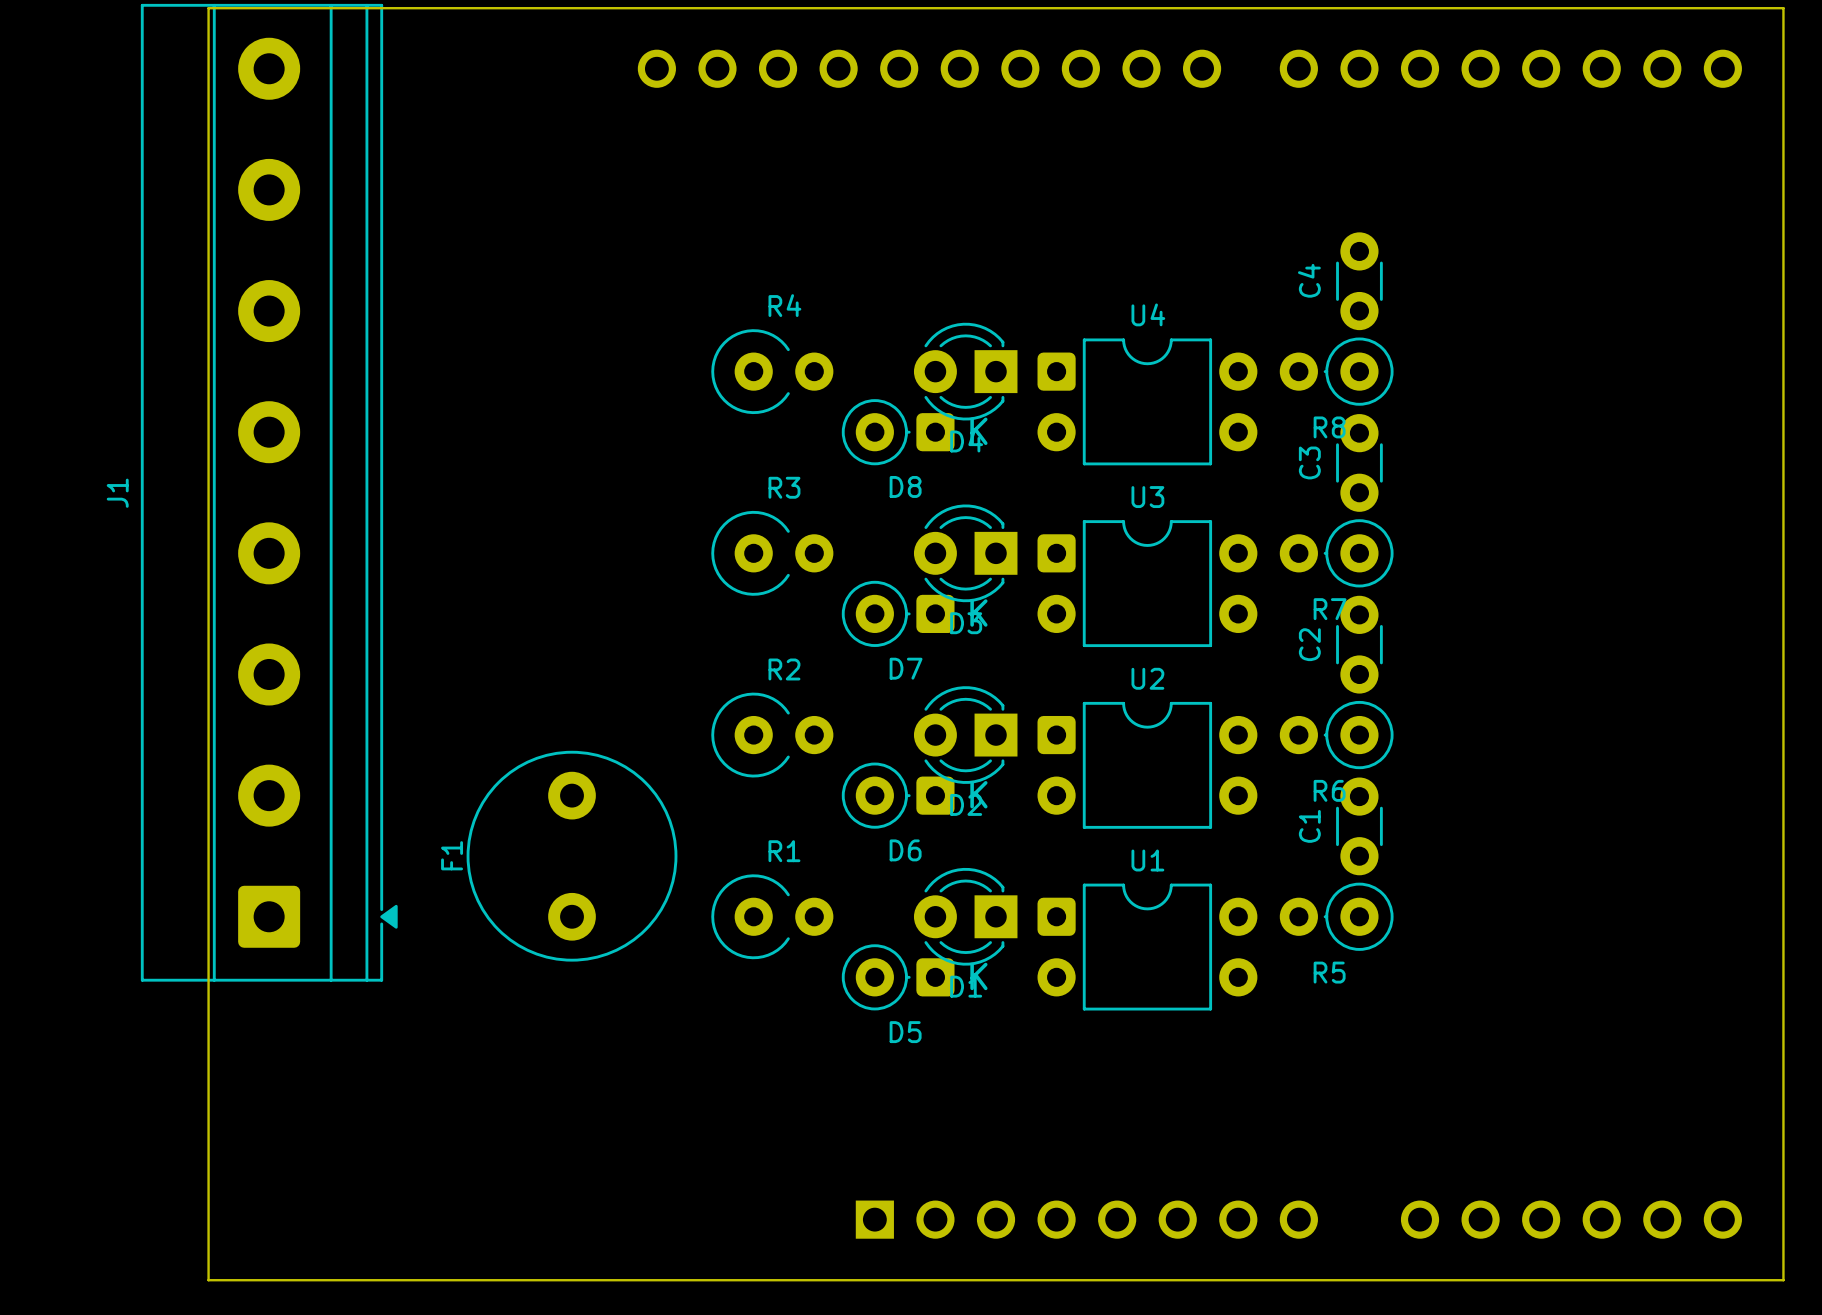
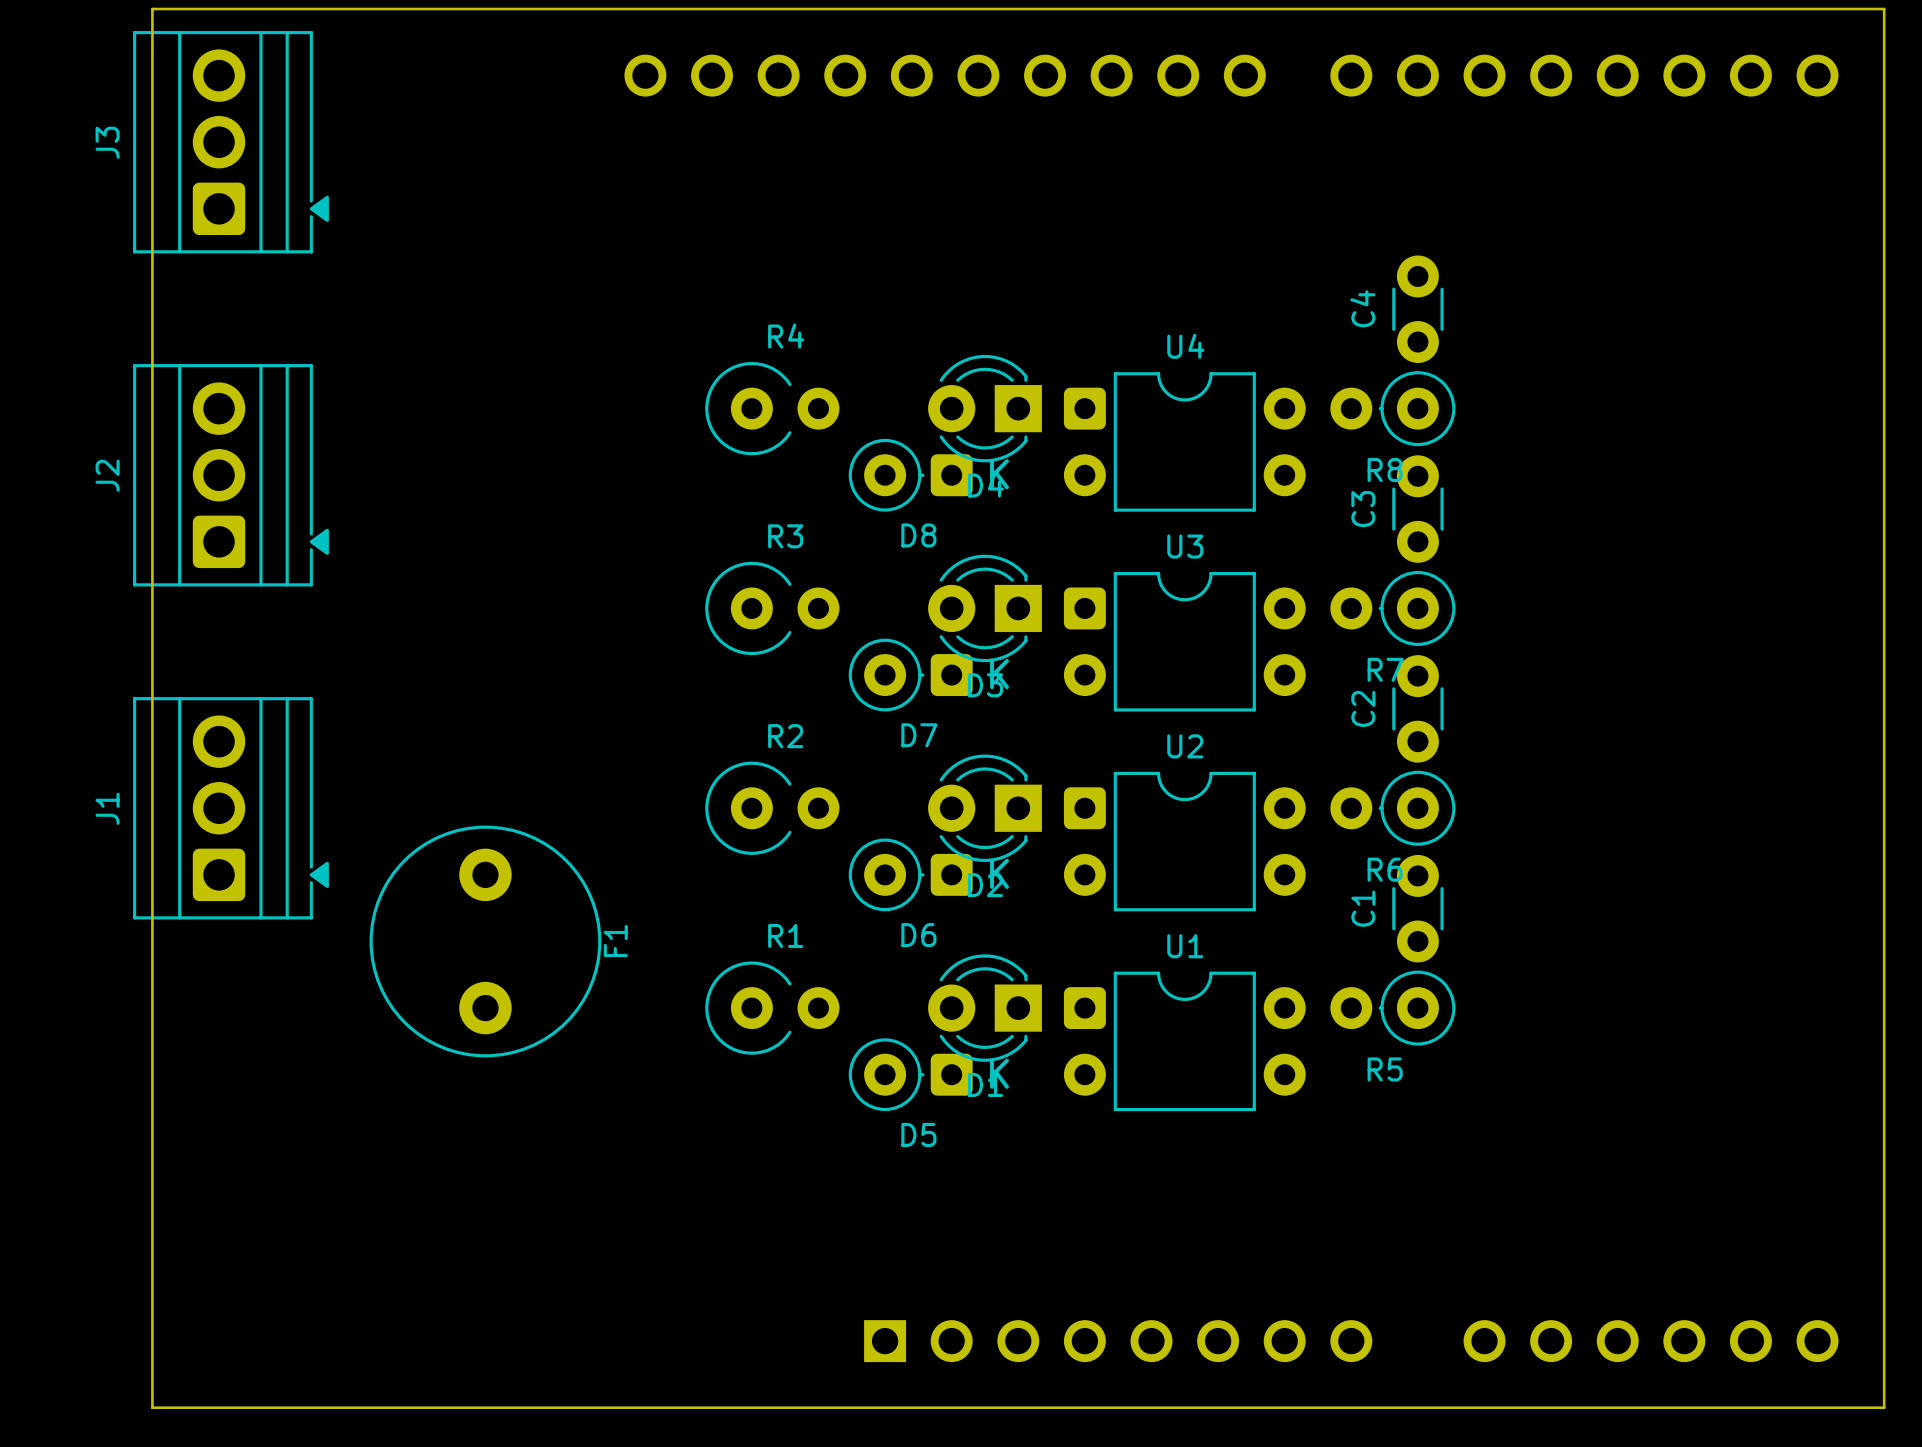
J1 footprint: [140, 3, 398, 982] -> [133, 697, 329, 920]
J3: none -> (230, 142)
J2: none -> (230, 475)
F1 name position: F1 (452, 855) -> F1 (615, 940)
F1 position: (572, 856) -> (485, 941)

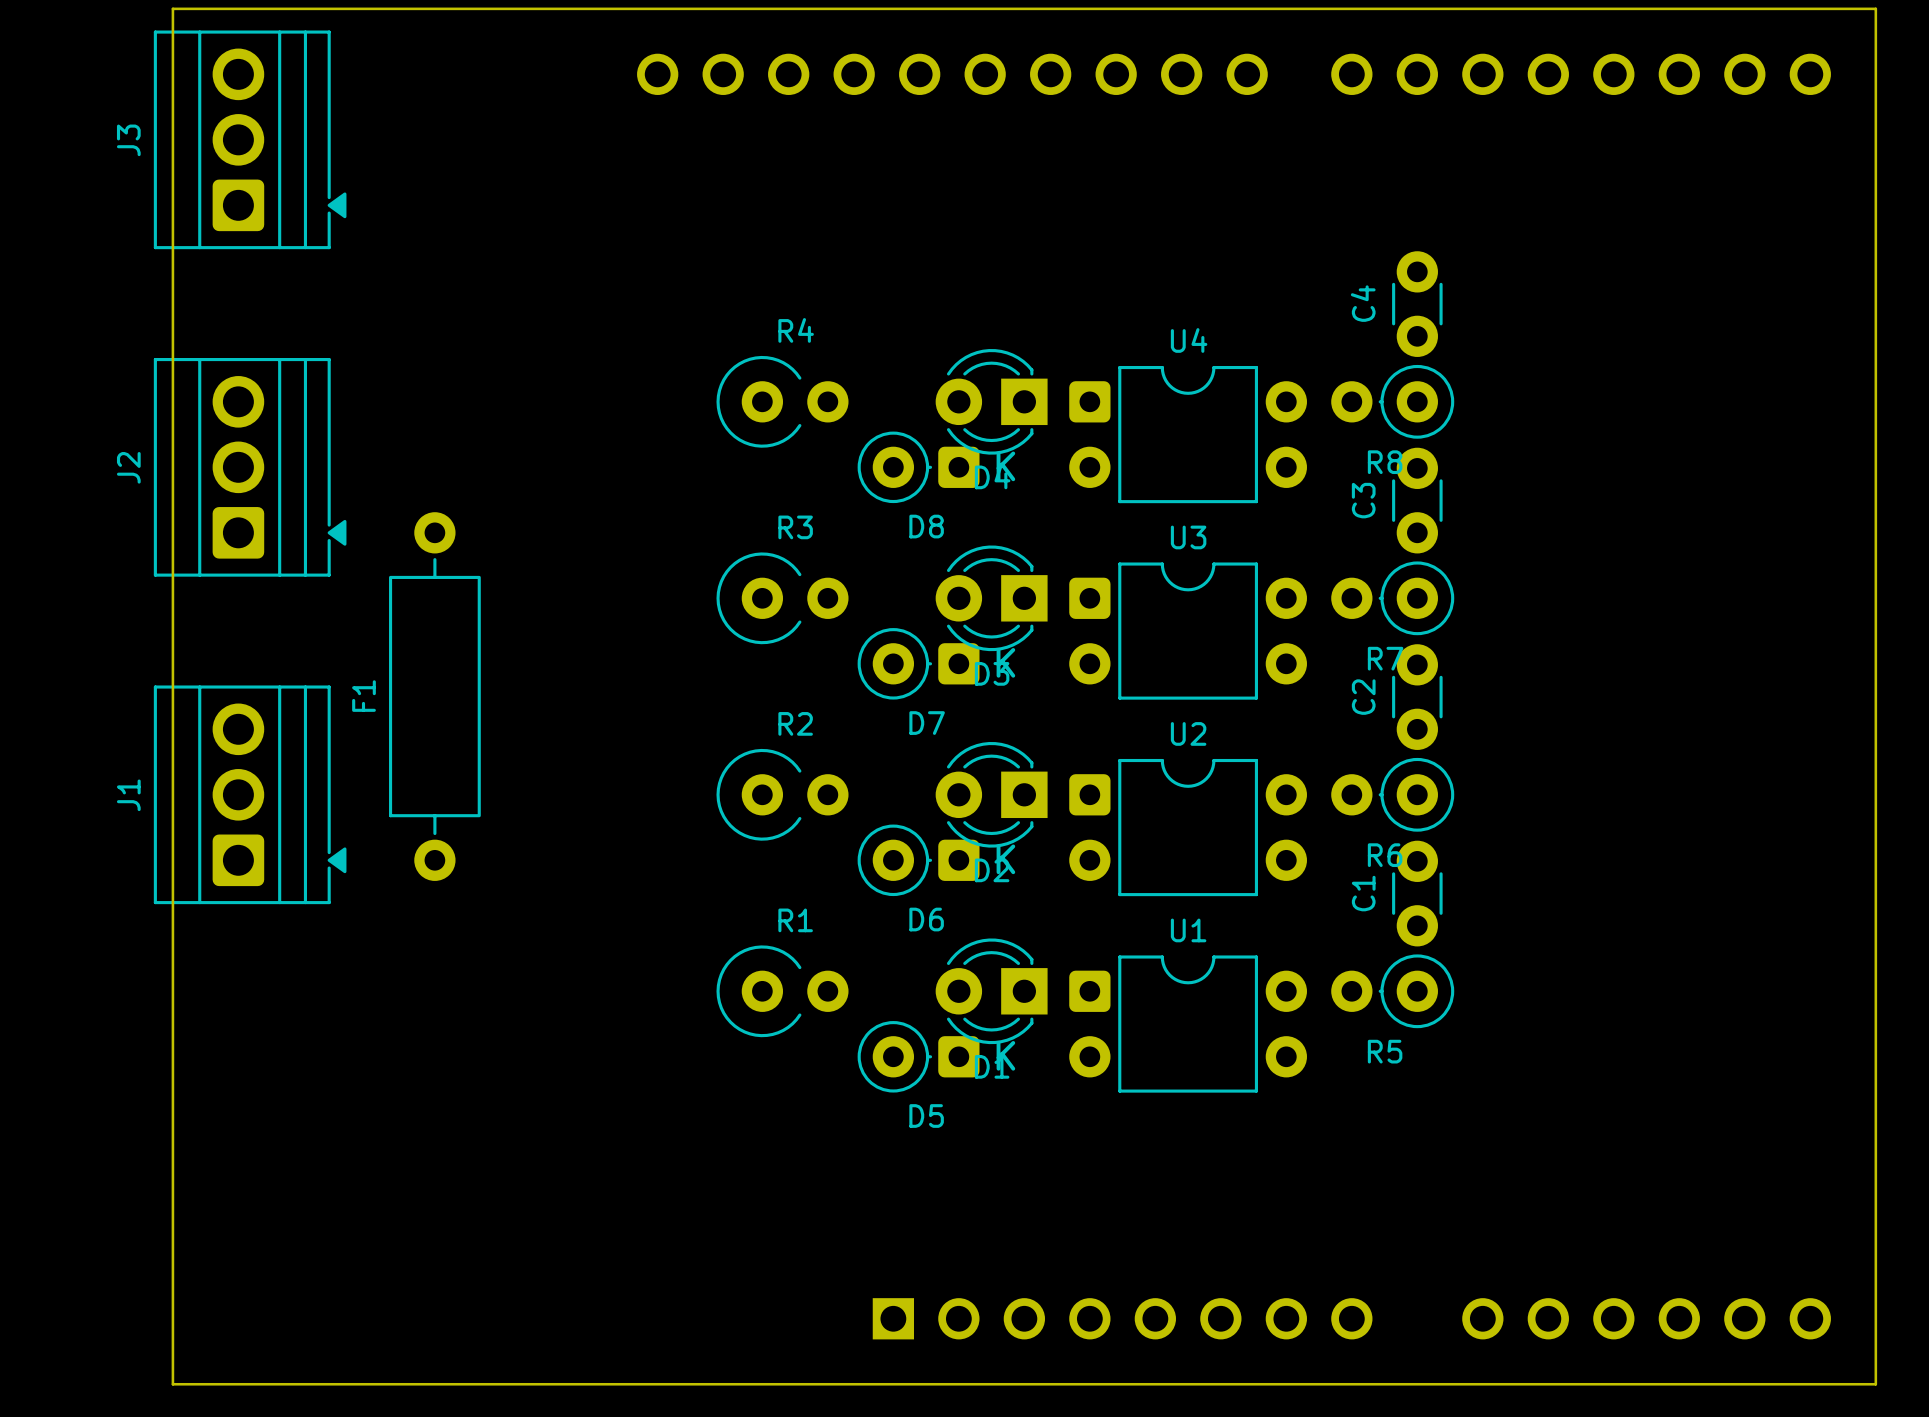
F1 footprint: [369, 825, 602, 1058] -> [389, 512, 481, 881]
F1 name position: F1 (615, 940) -> F1 (363, 696)

